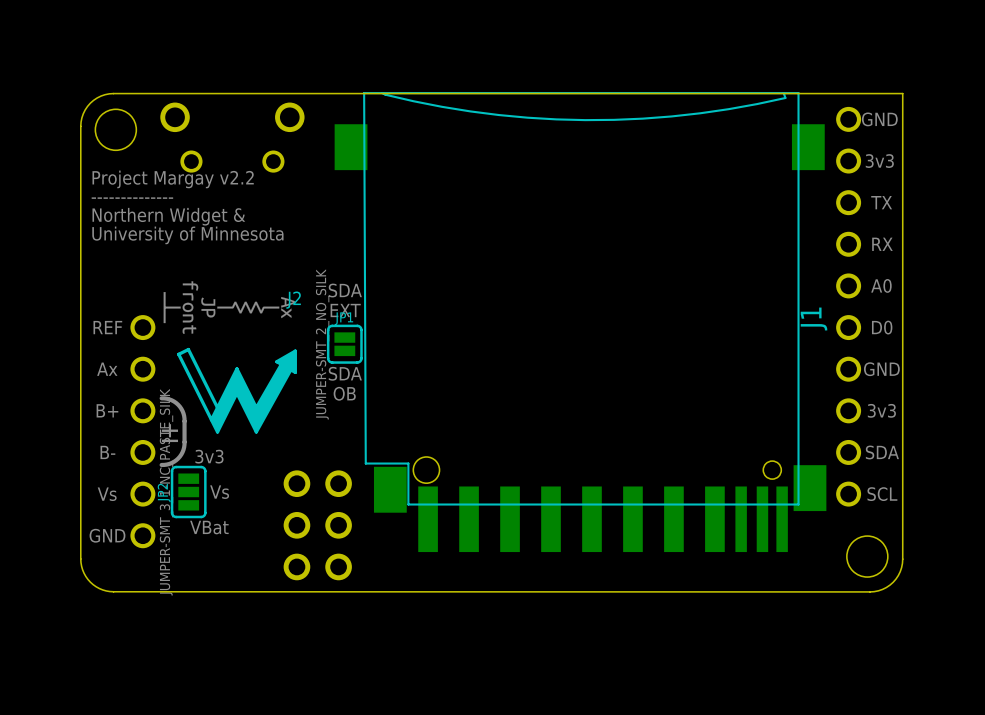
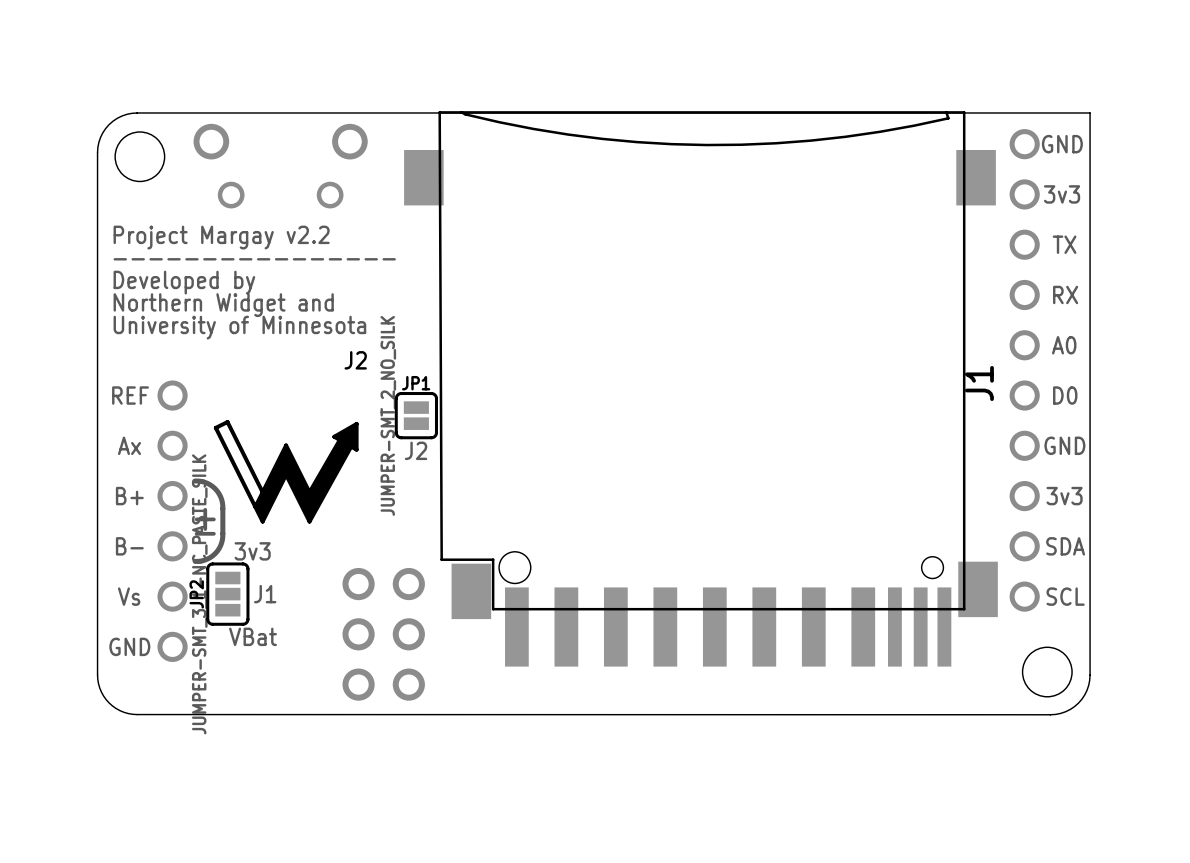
text: Project Margay v2.2 (173, 179) -> none
text: -------------- (132, 198) -> Project Margay v2.2 (221, 237)
text: Northern Widget & (168, 216) -> ---------------- (254, 259)
text: University of Minnesota (187, 235) -> Developed by (184, 282)
text: none -> Northern Widget and (223, 305)
text: none -> University of Minnesota (239, 327)
drawing: [163, 281, 295, 334] -> none
text: SDA (345, 290) -> none
text: EXT (345, 310) -> none
text: SDA (345, 373) -> J2 (416, 450)
text: OB (344, 393) -> none
text: Vs (219, 492) -> J1 (265, 594)

